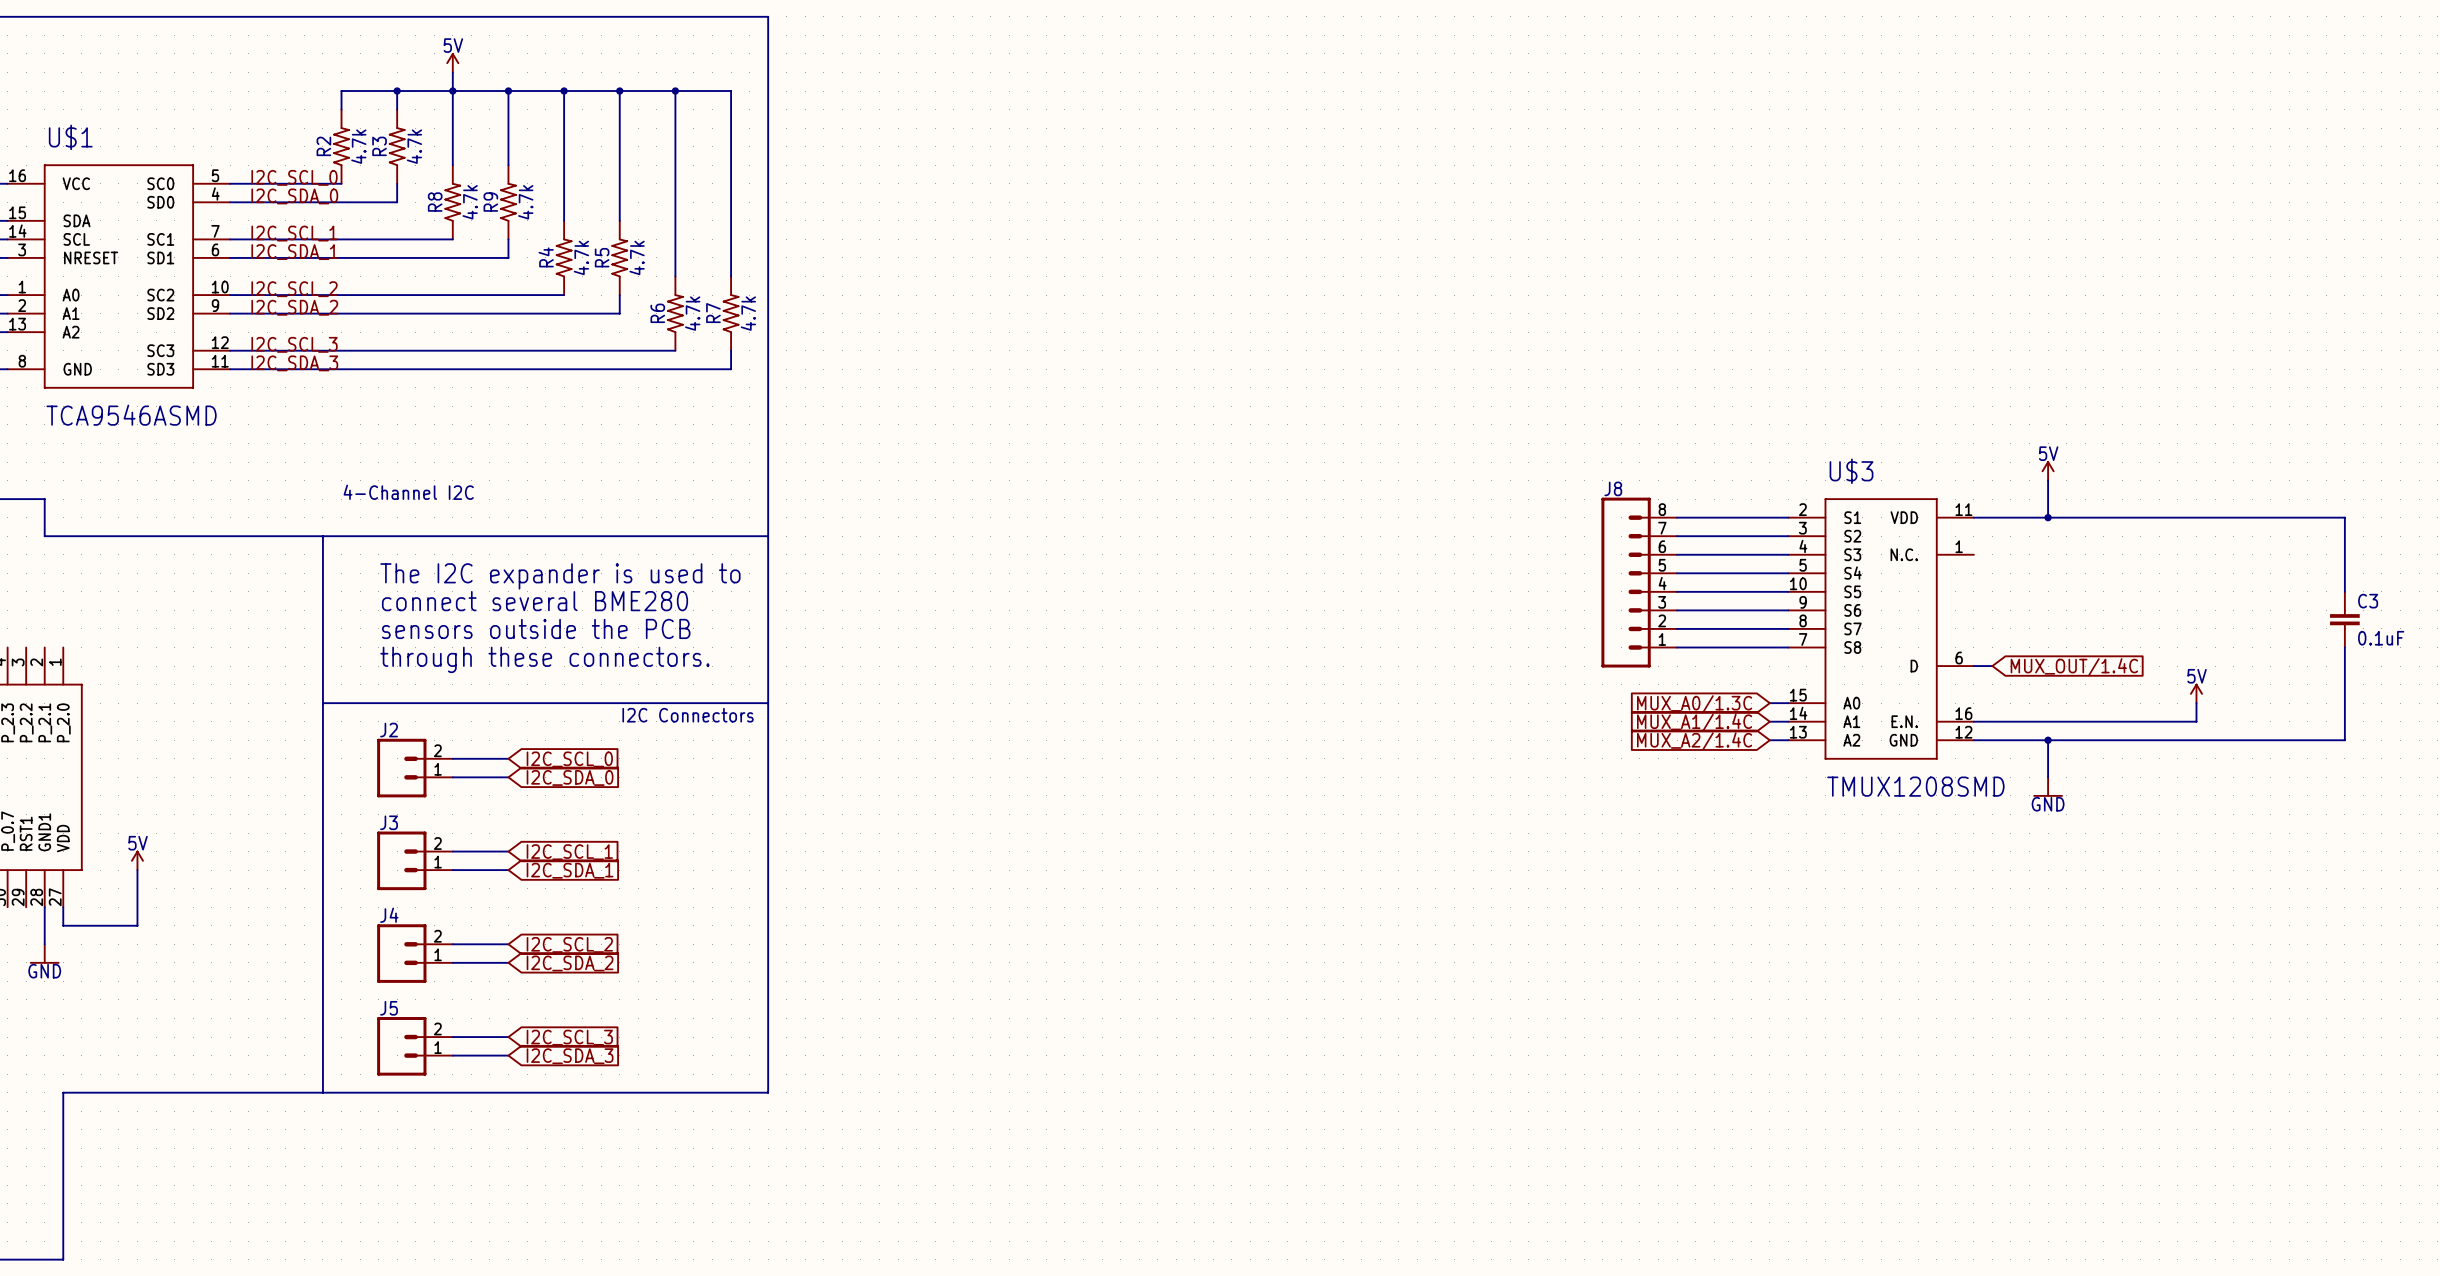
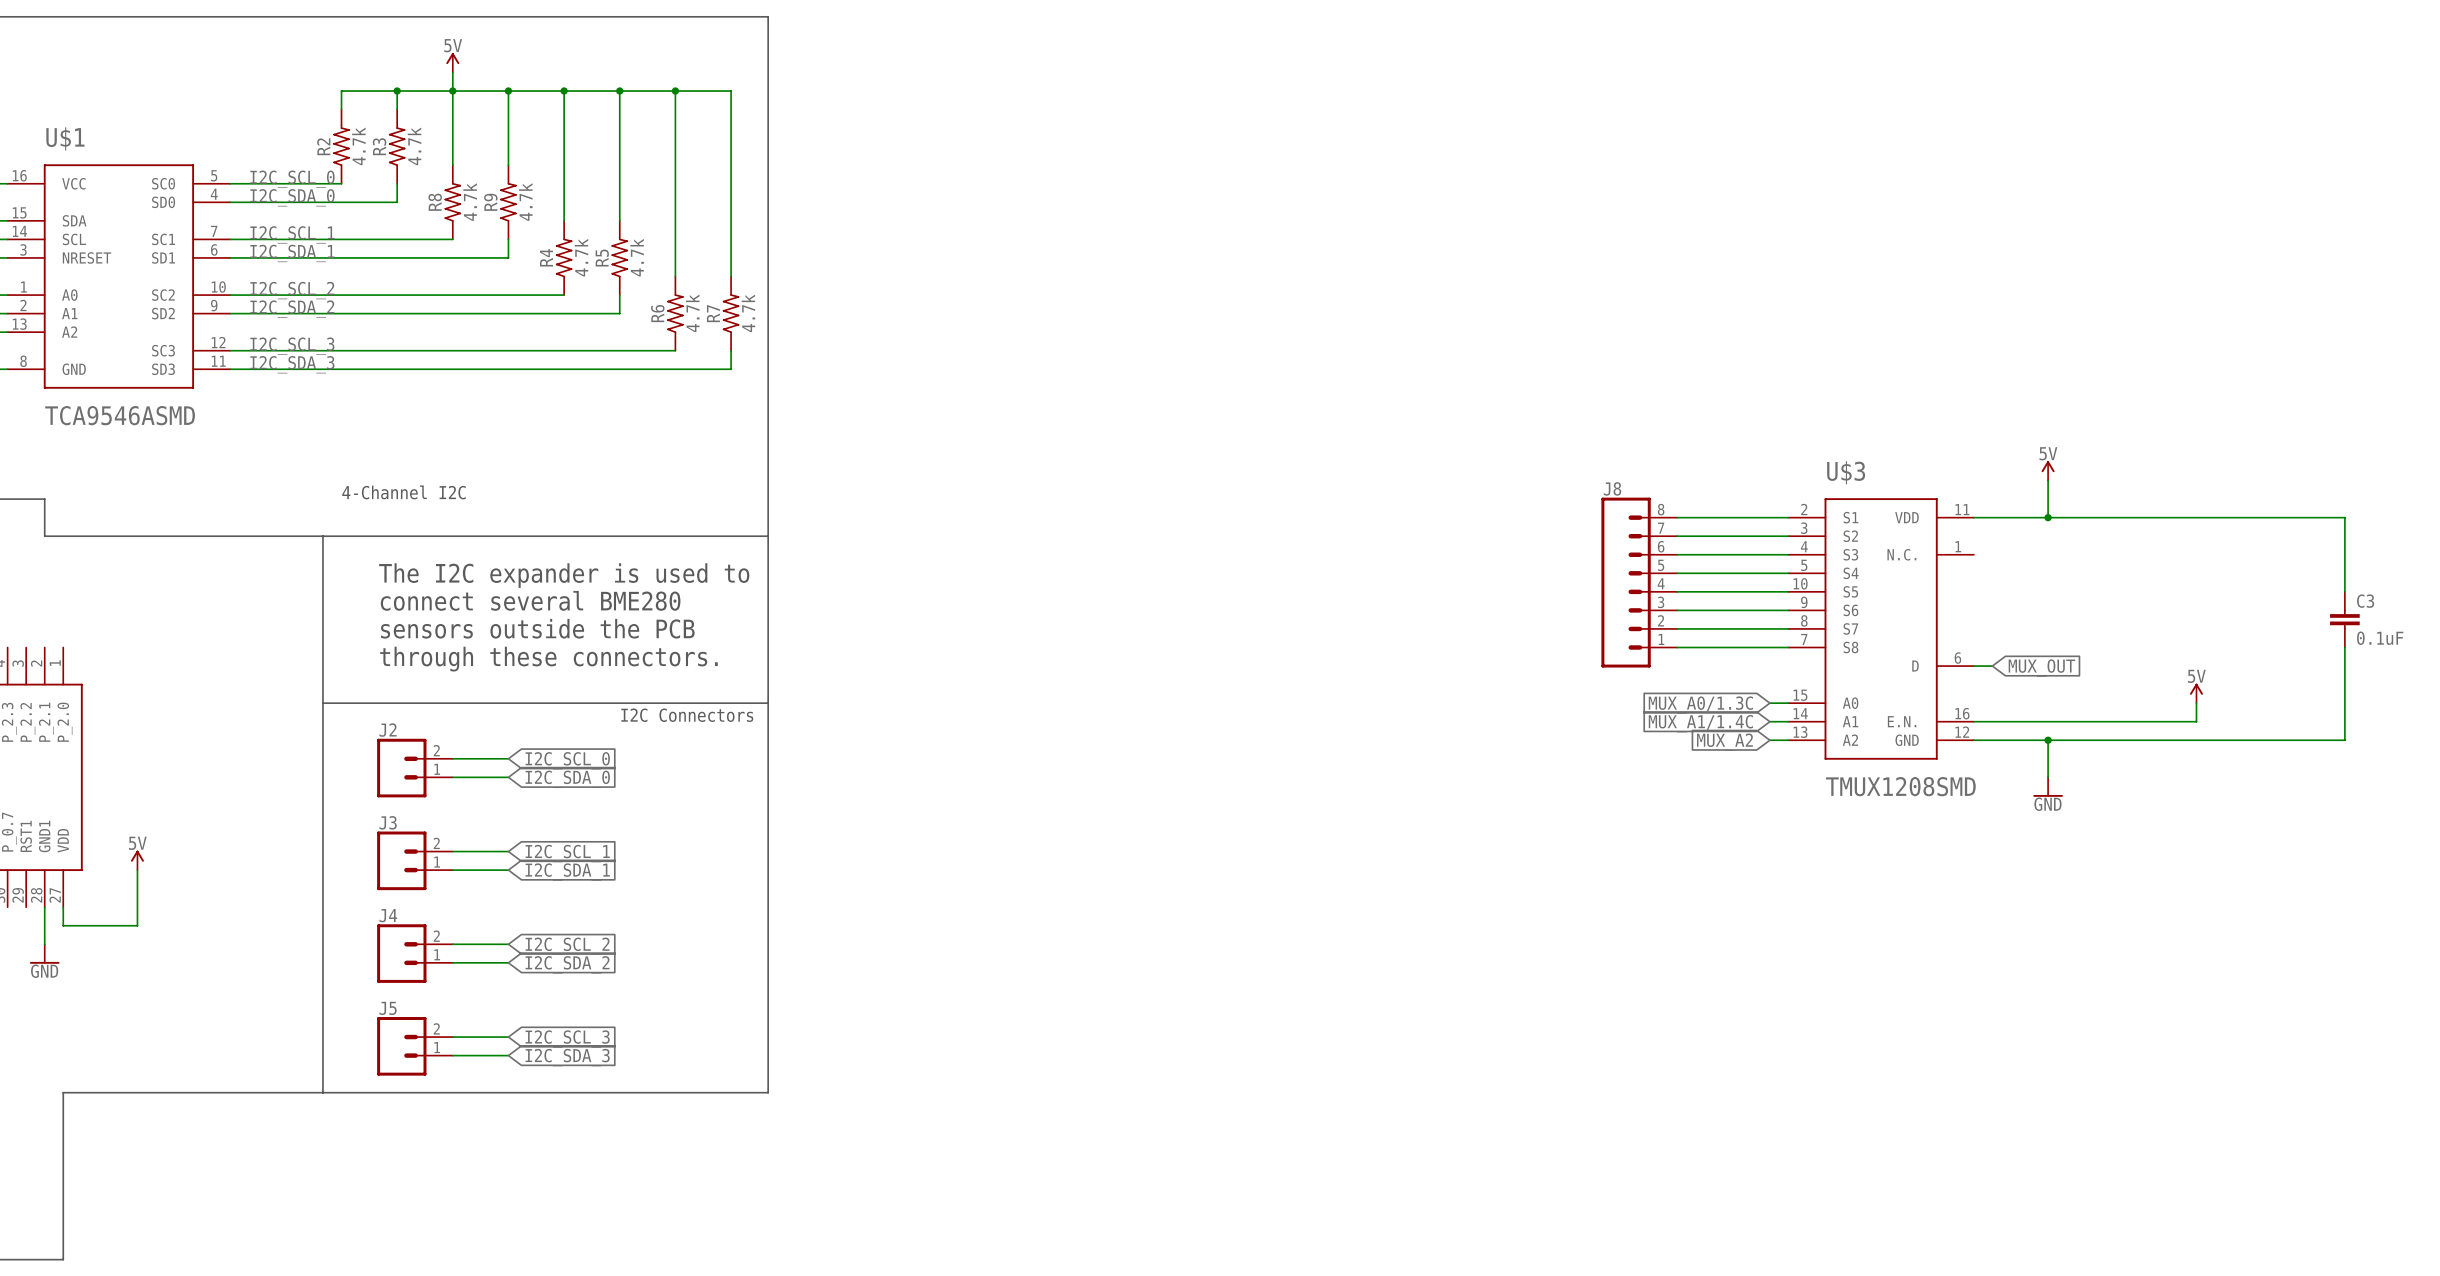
global label: MUX_OUT/1.4C (2074, 667) -> MUX_OUT (2041, 668)
global label: MUX_A2/1.4C (1694, 741) -> MUX_A2 (1724, 742)

